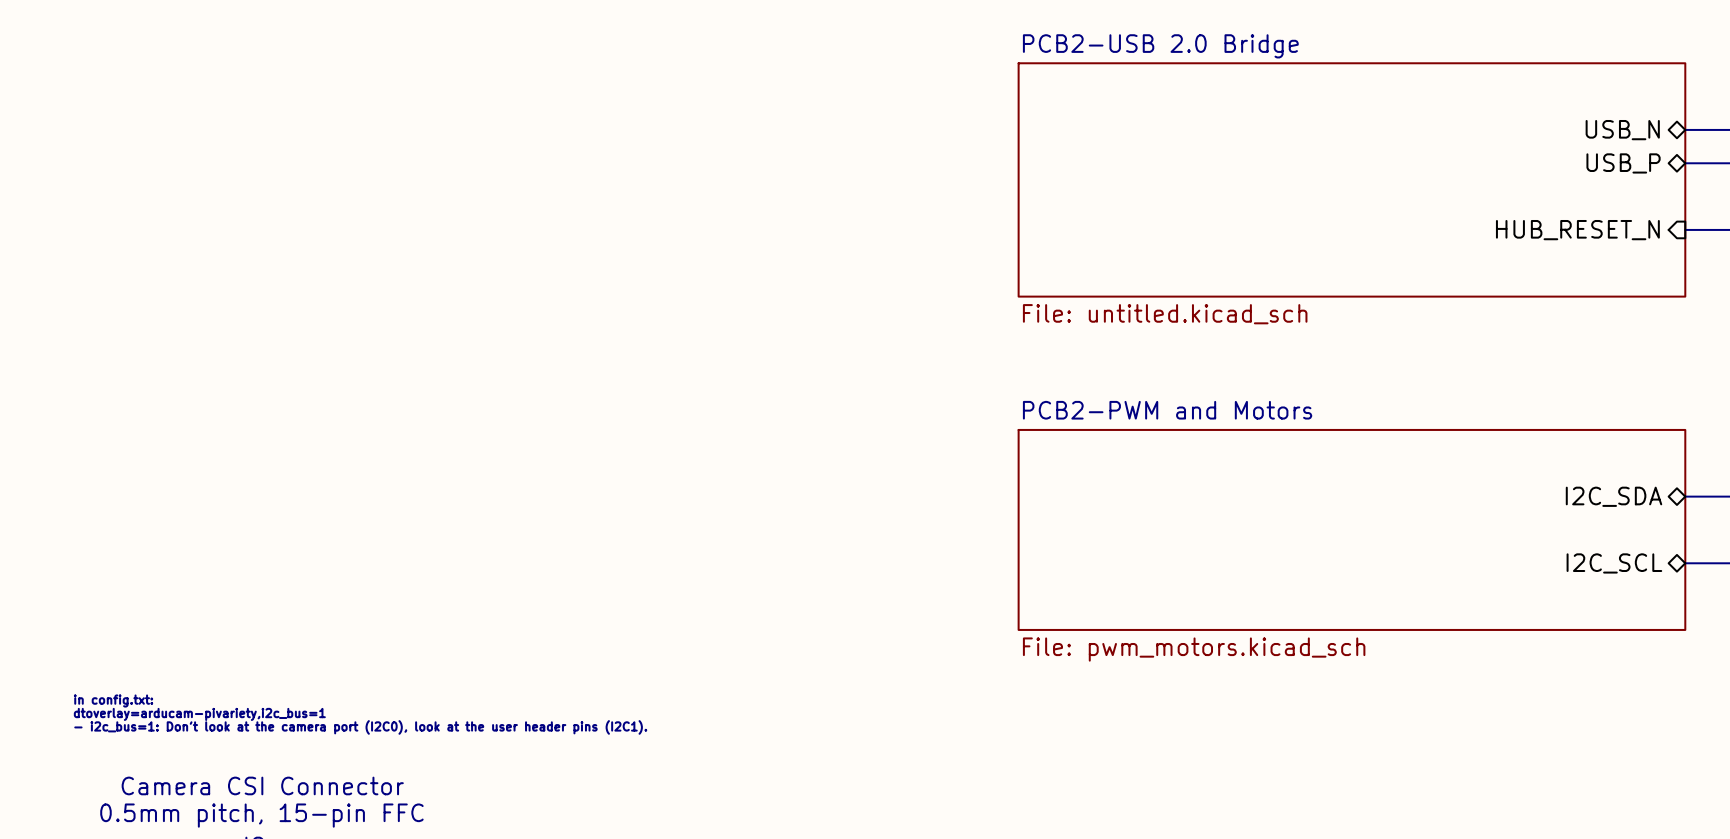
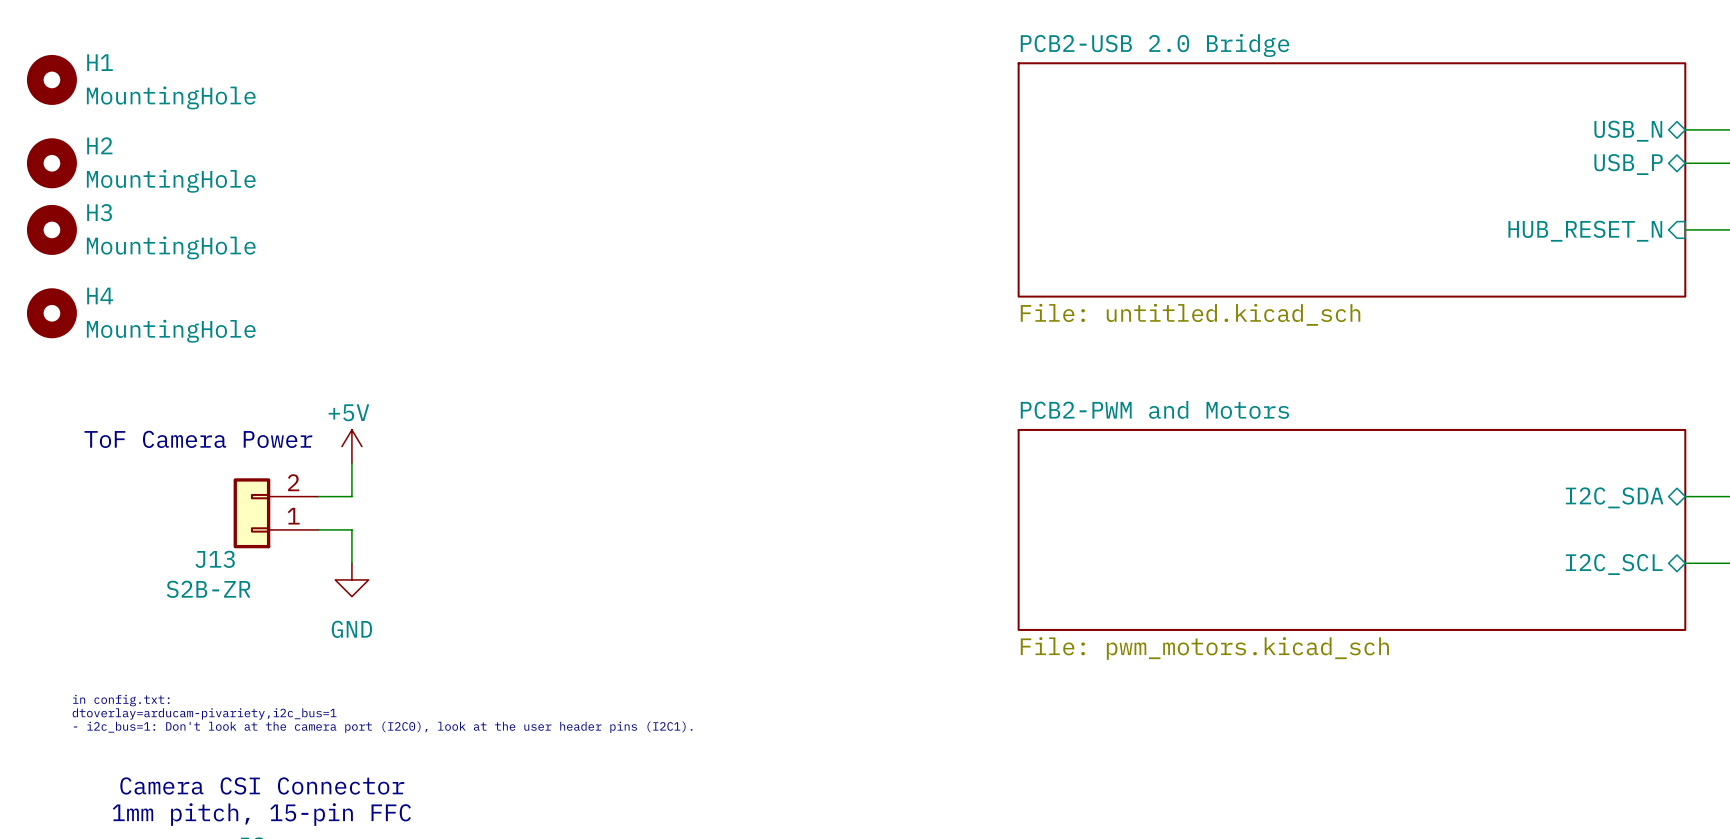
H1: none -> MountingHole (51, 79)
H2: none -> MountingHole (51, 163)
H3: none -> MountingHole (51, 229)
H4: none -> MountingHole (51, 313)
text: none -> ToF Camera Power (198, 439)
power symbol: none -> +5V (351, 446)
wire: none -> (351, 463) (351, 496) (318, 496)
J13: none -> S2B-ZR (276, 513)
wire: none -> (318, 529) (351, 529) (351, 563)
power symbol: none -> GND (351, 579)
text: 0.5mm pitch, 15-pin FFC (261, 815) -> 1mm pitch, 15-pin FFC (261, 814)

